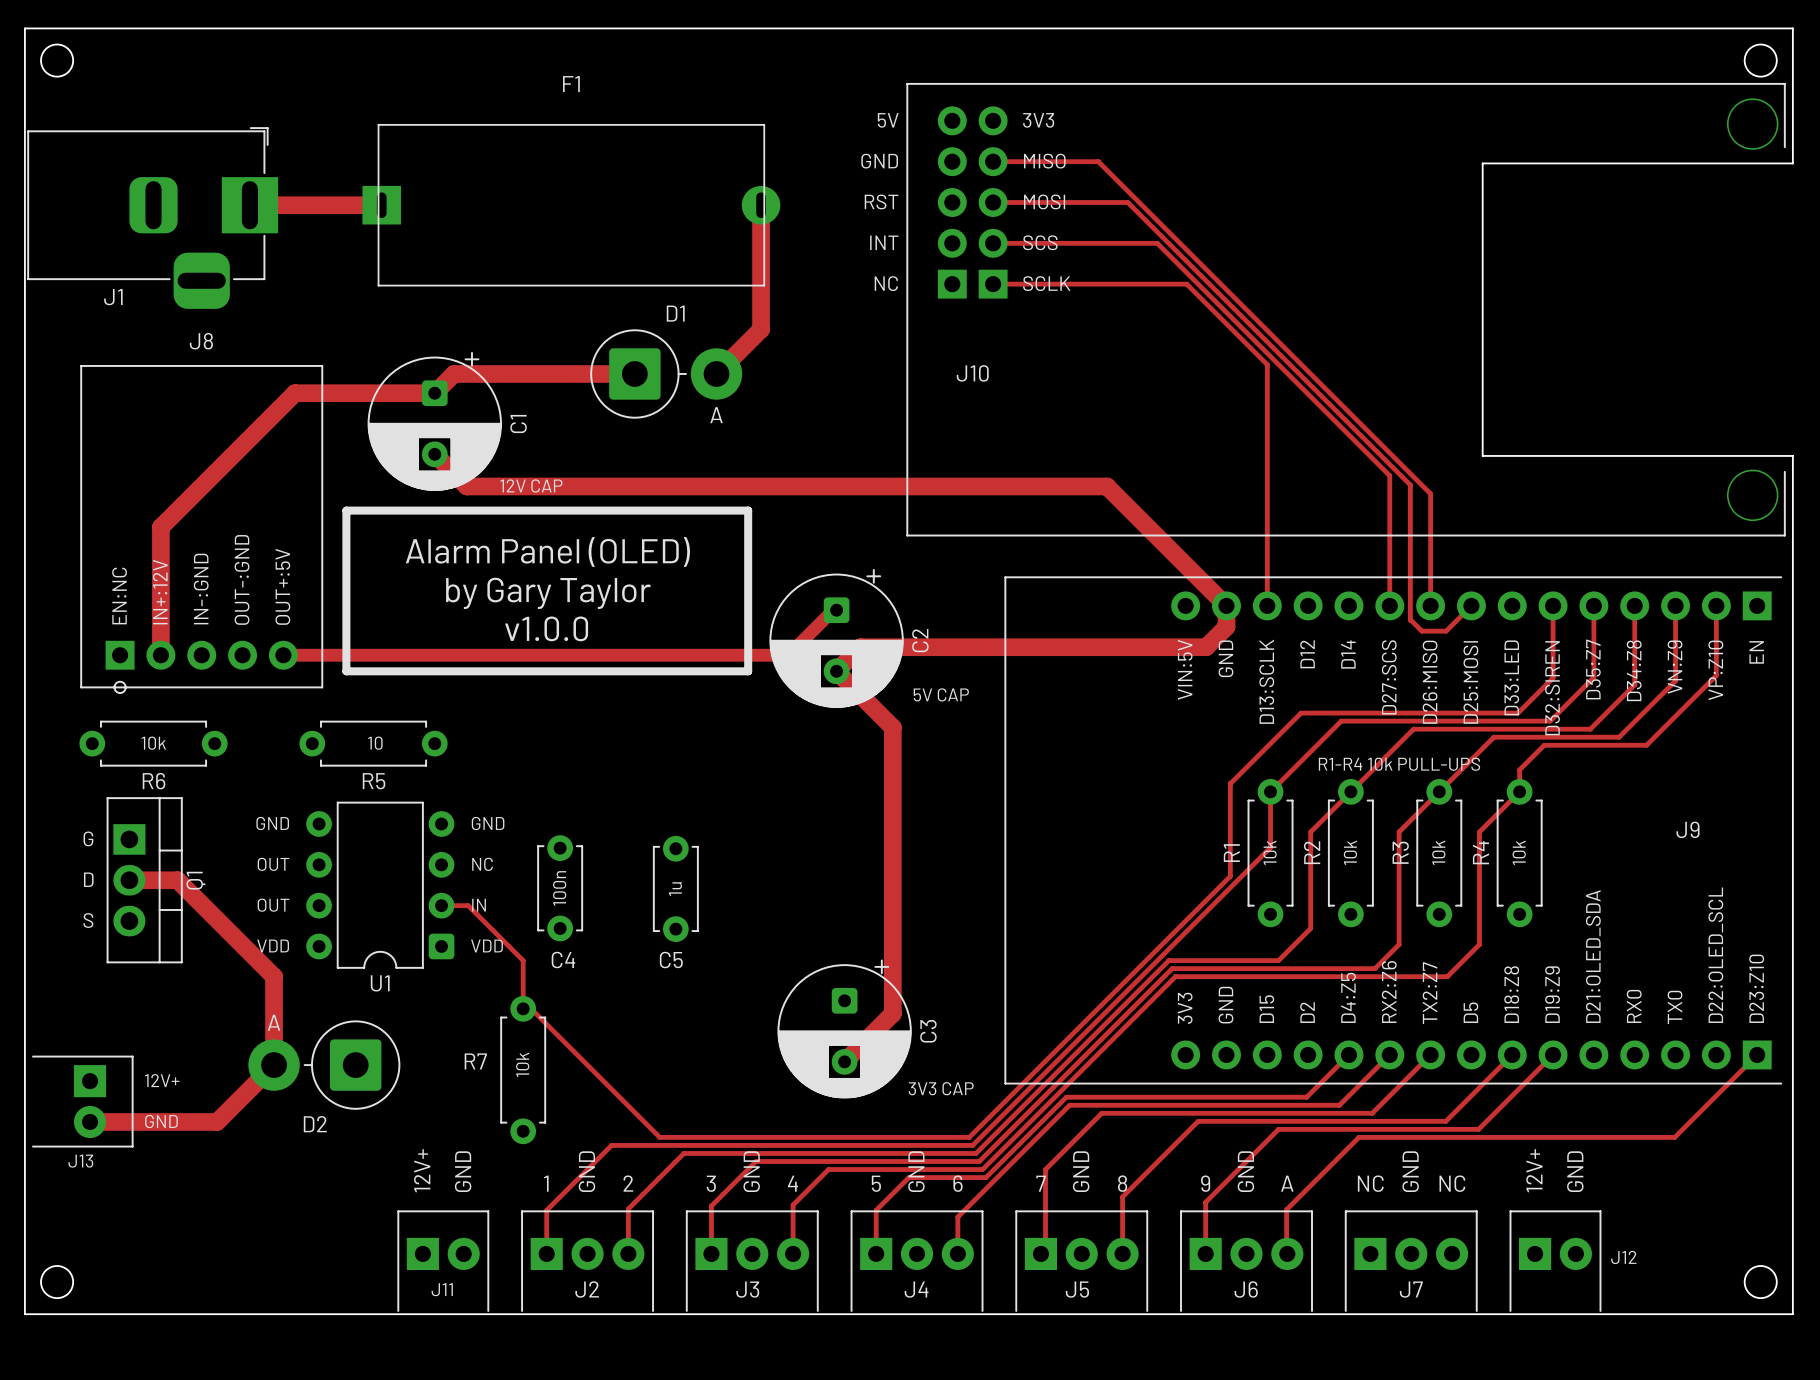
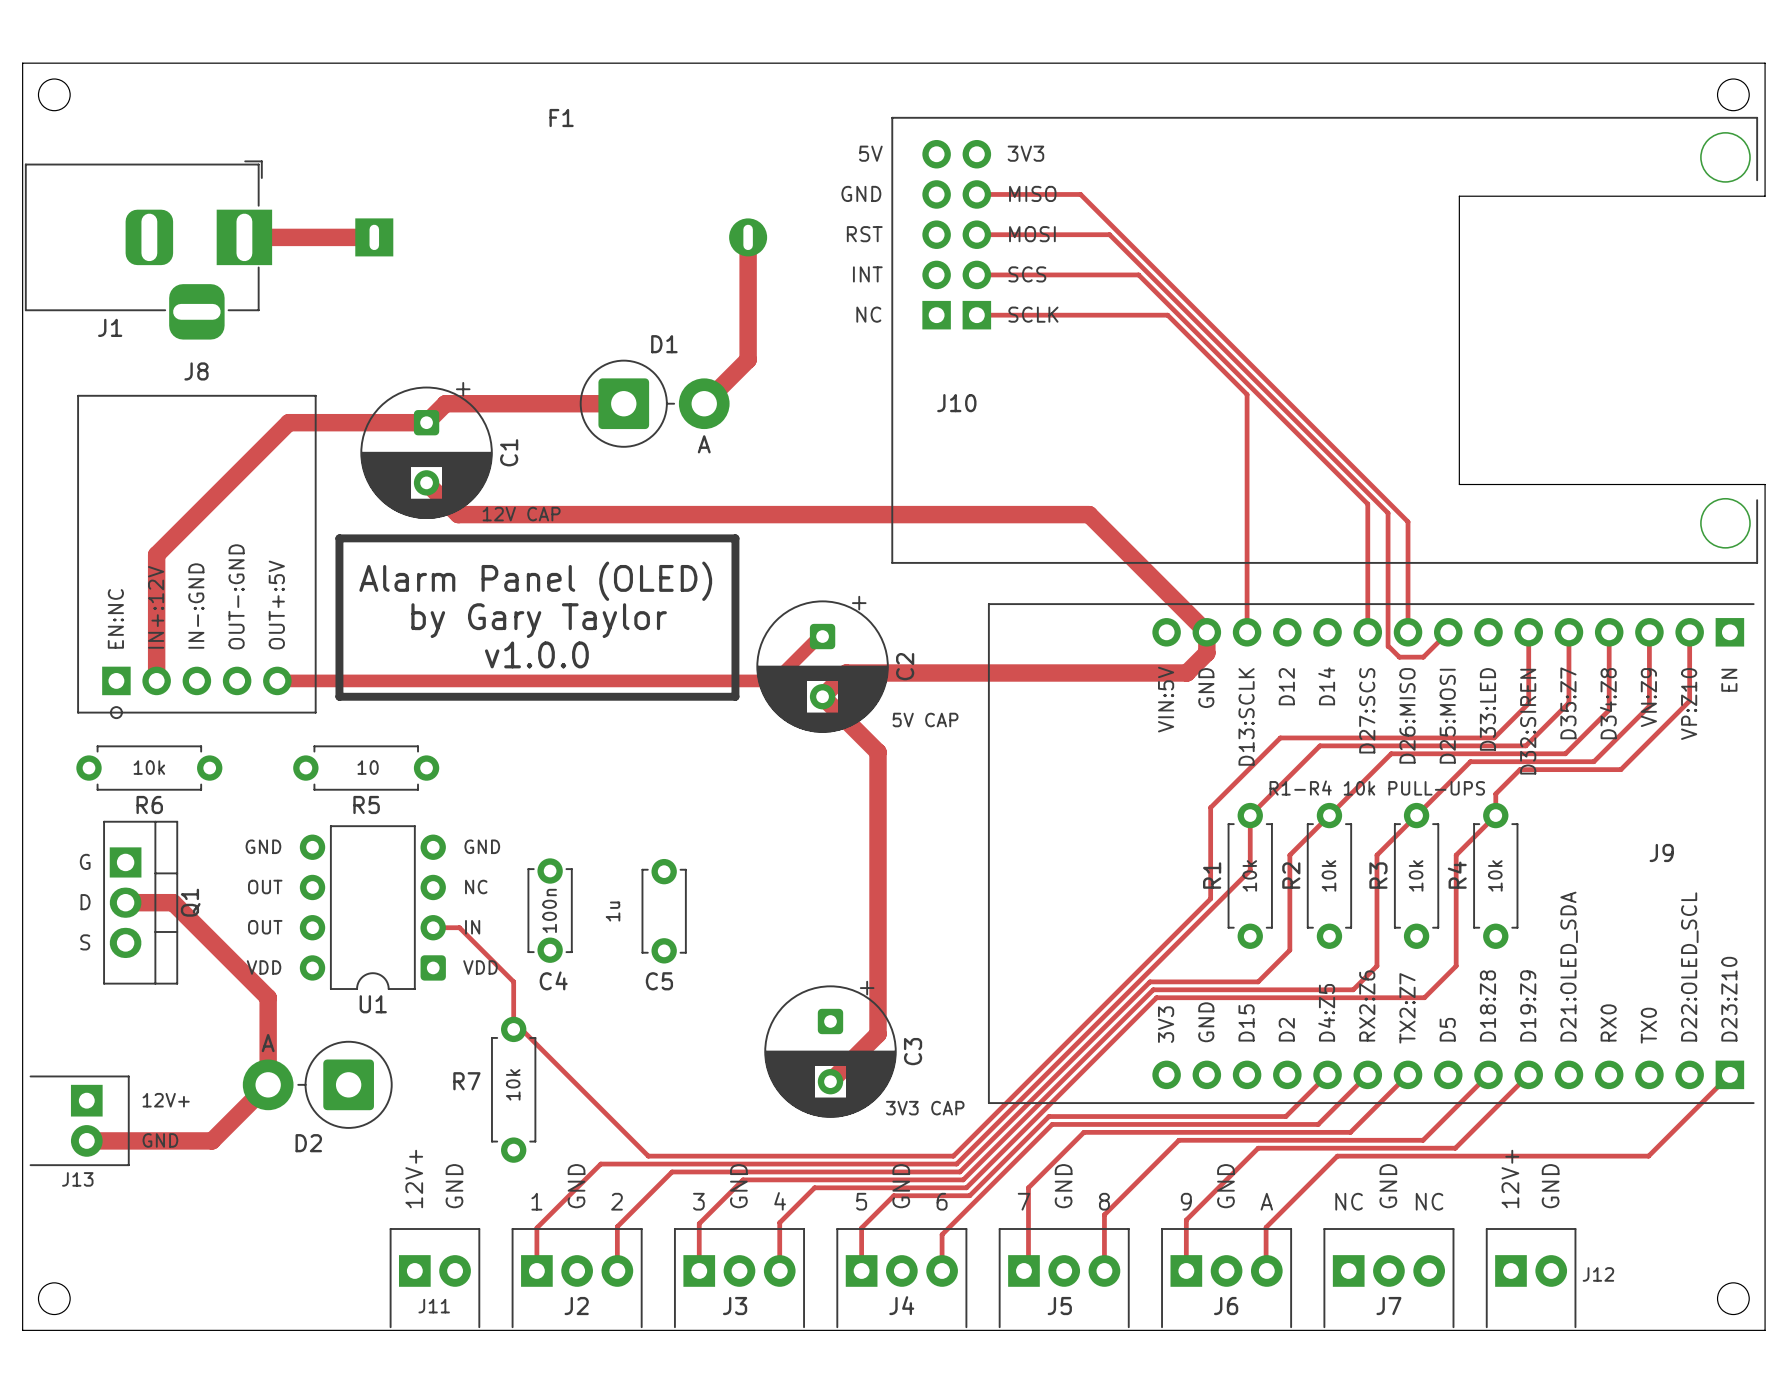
F1 footprint: [362, 124, 781, 287] -> [355, 218, 768, 257]
text position: 1u (675, 889) -> 1u (613, 911)

